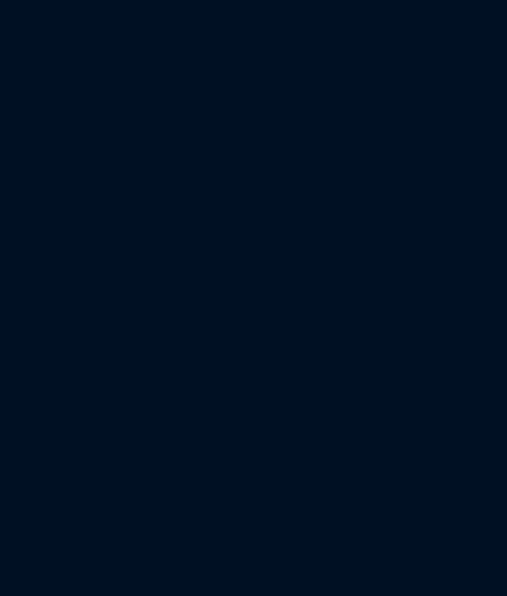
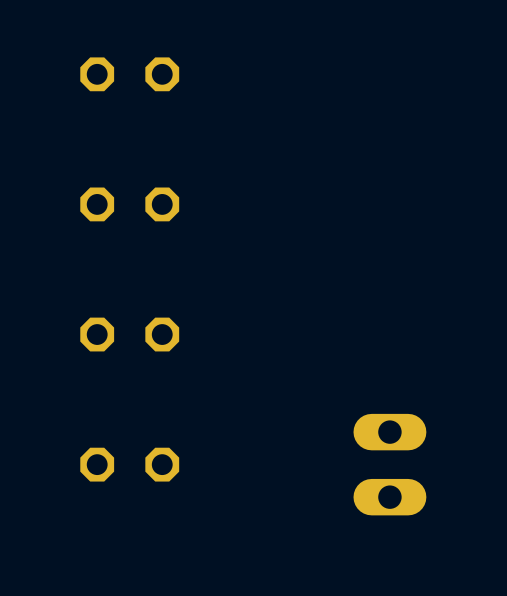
part: none -> (129, 74)
part: none -> (129, 204)
part: none -> (129, 334)
part: none -> (129, 464)
part: none -> (389, 464)

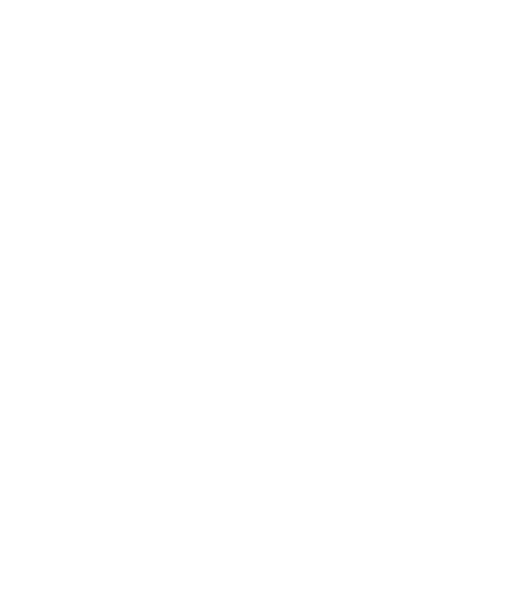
part: (129, 74) -> none
part: (129, 204) -> none
part: (129, 334) -> none
part: (129, 464) -> none
part: (389, 464) -> none

